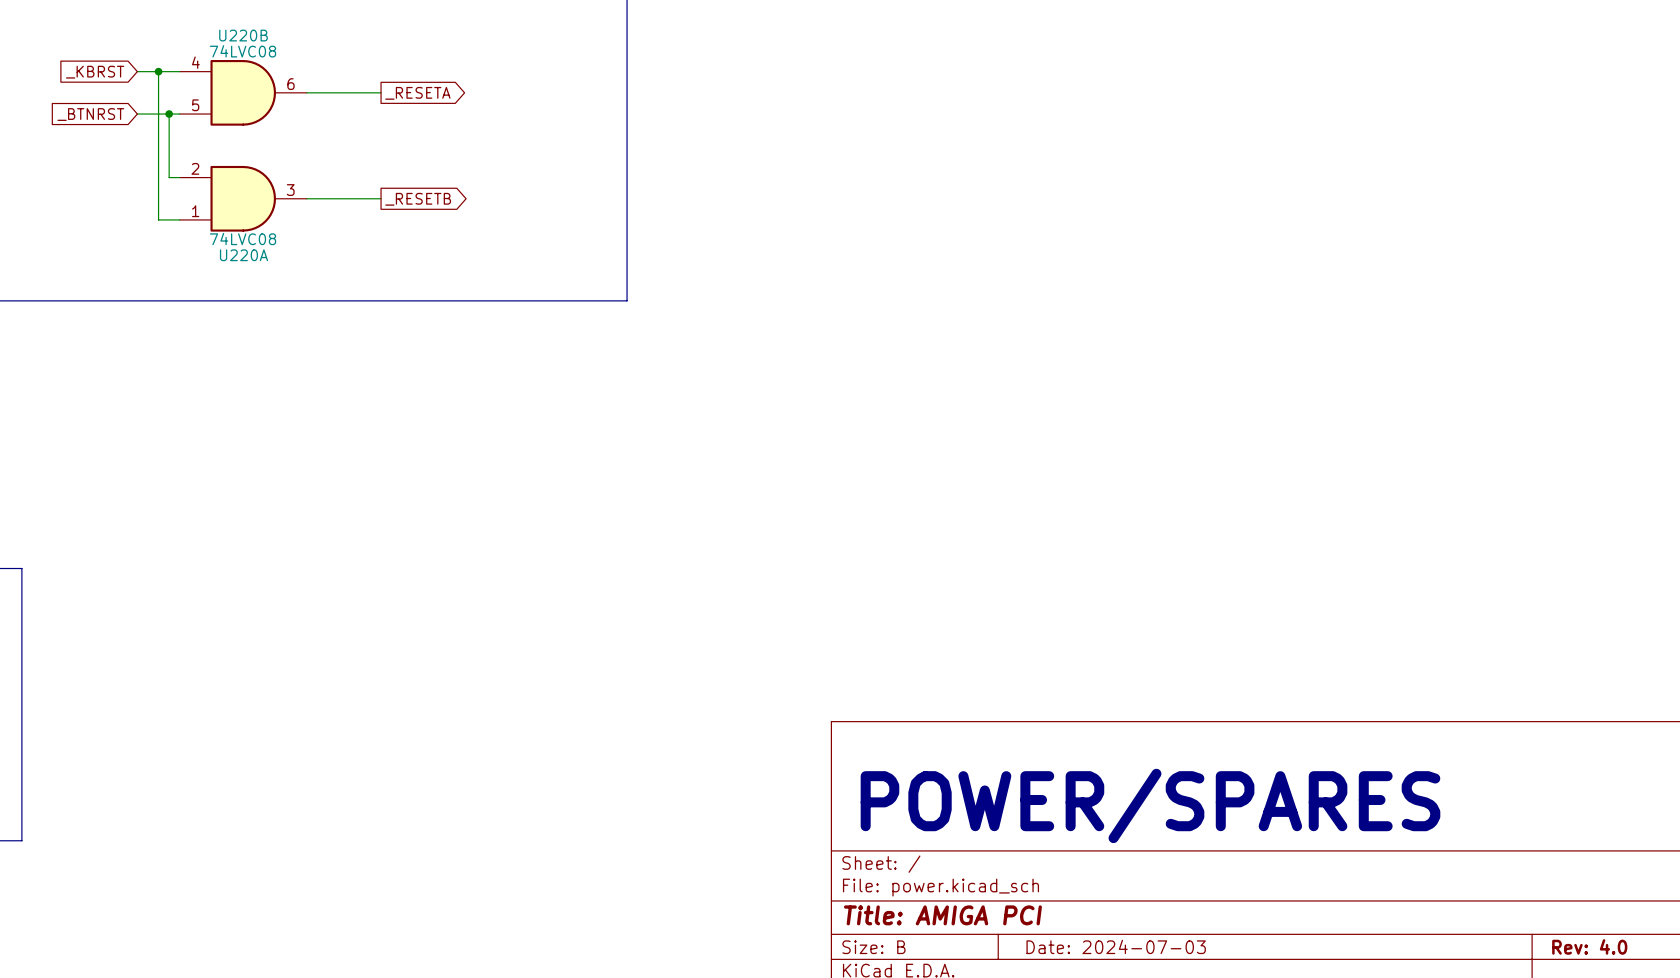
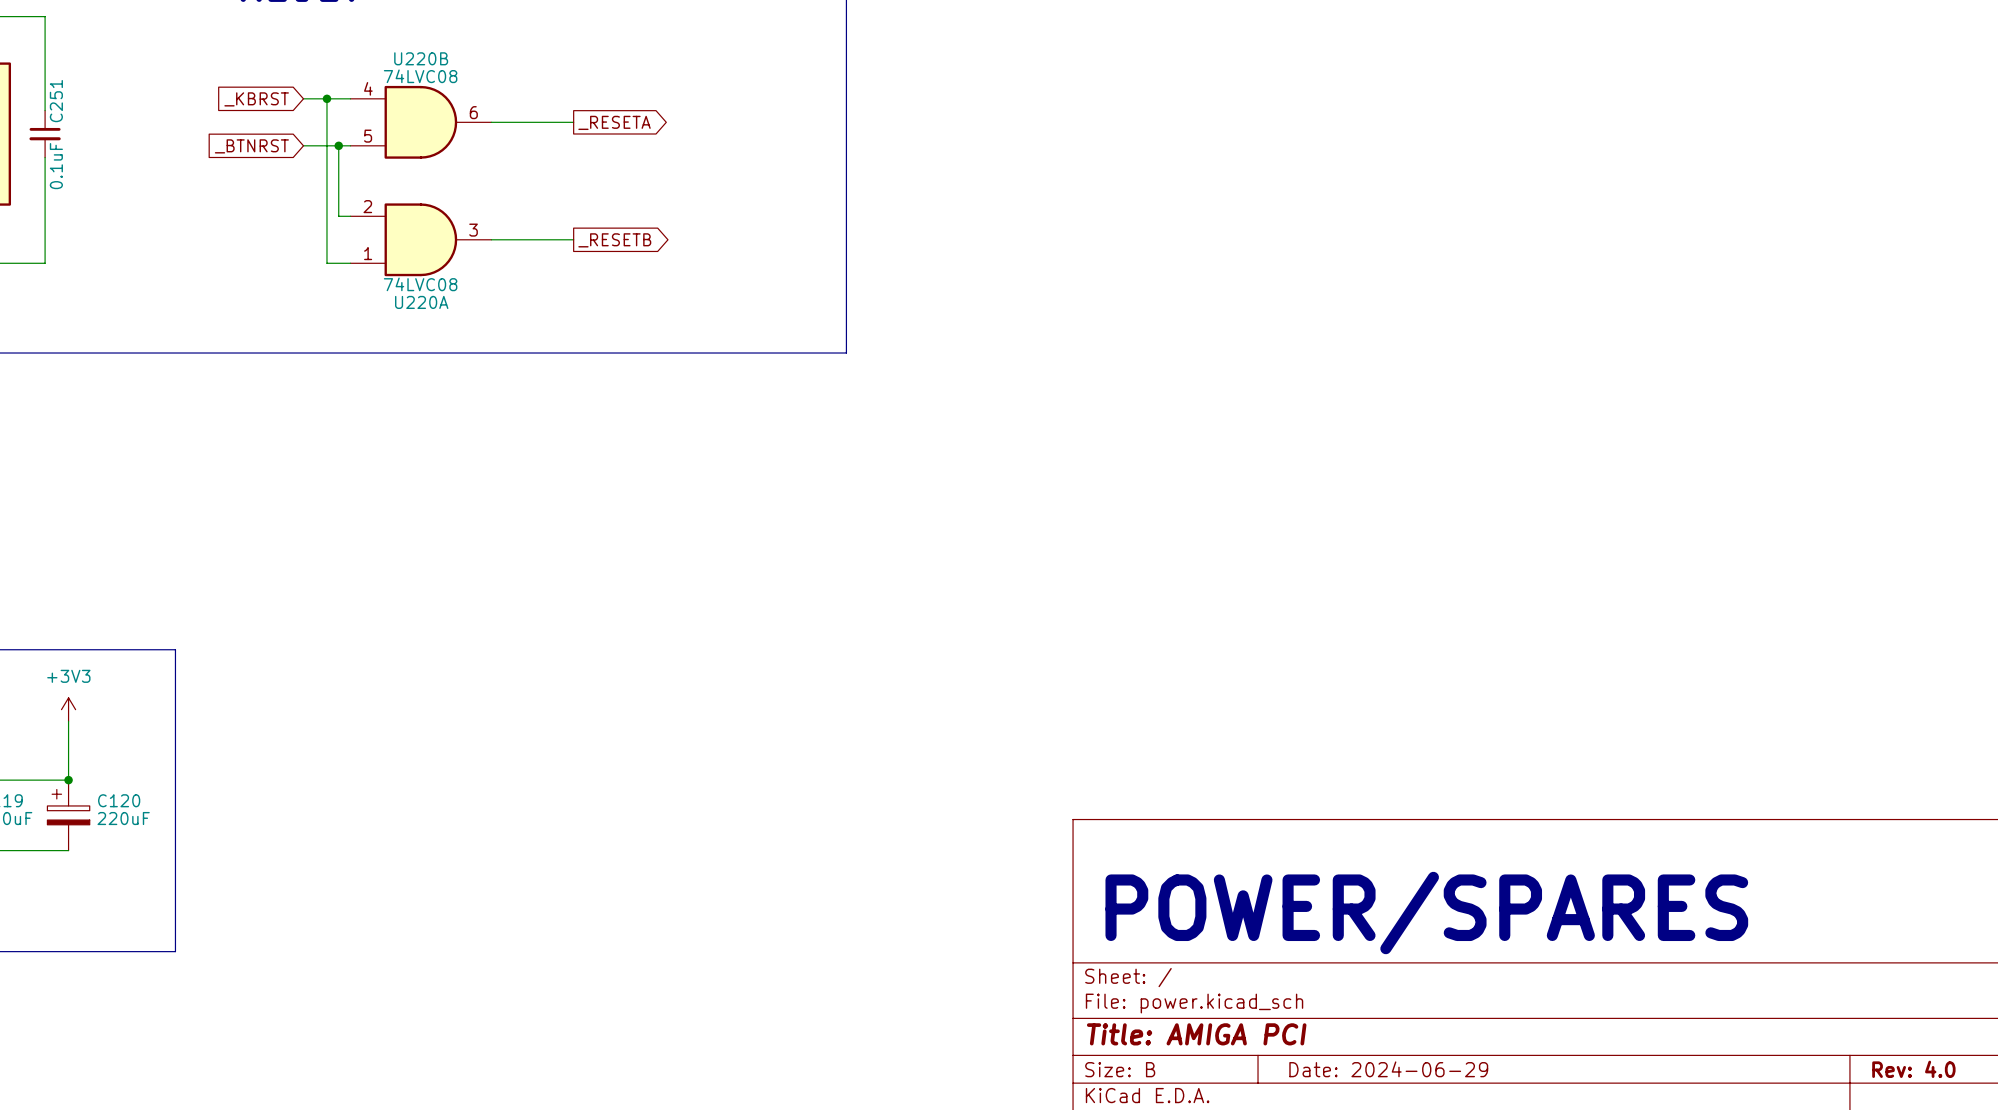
title block: Date: 2024-07-03 (1116, 946) -> Date: 2024-06-29 (1388, 1069)

